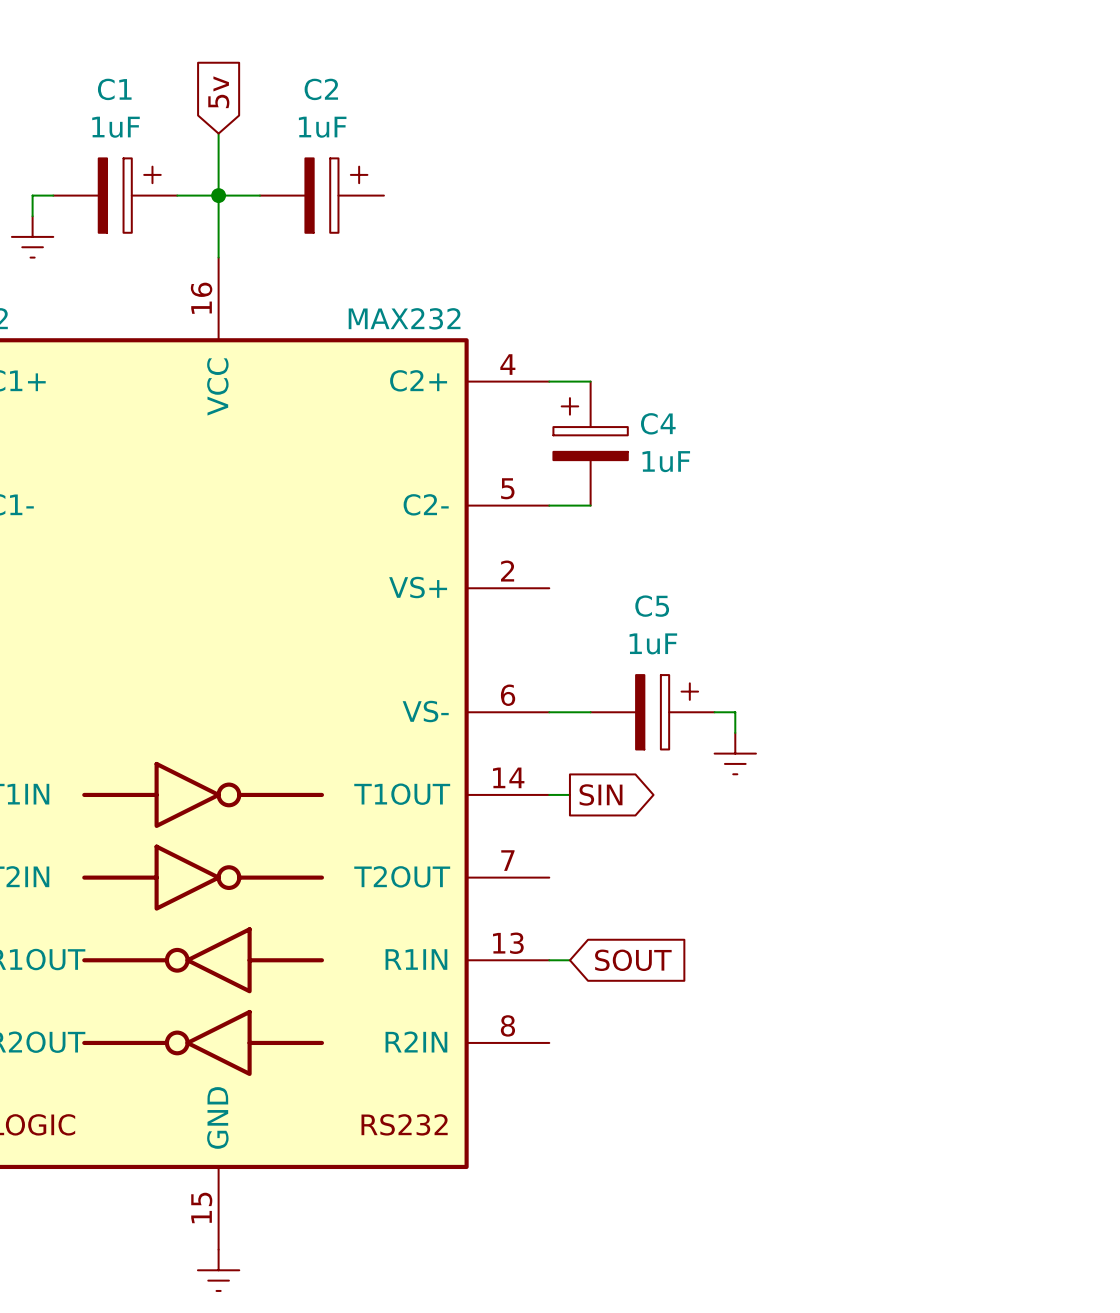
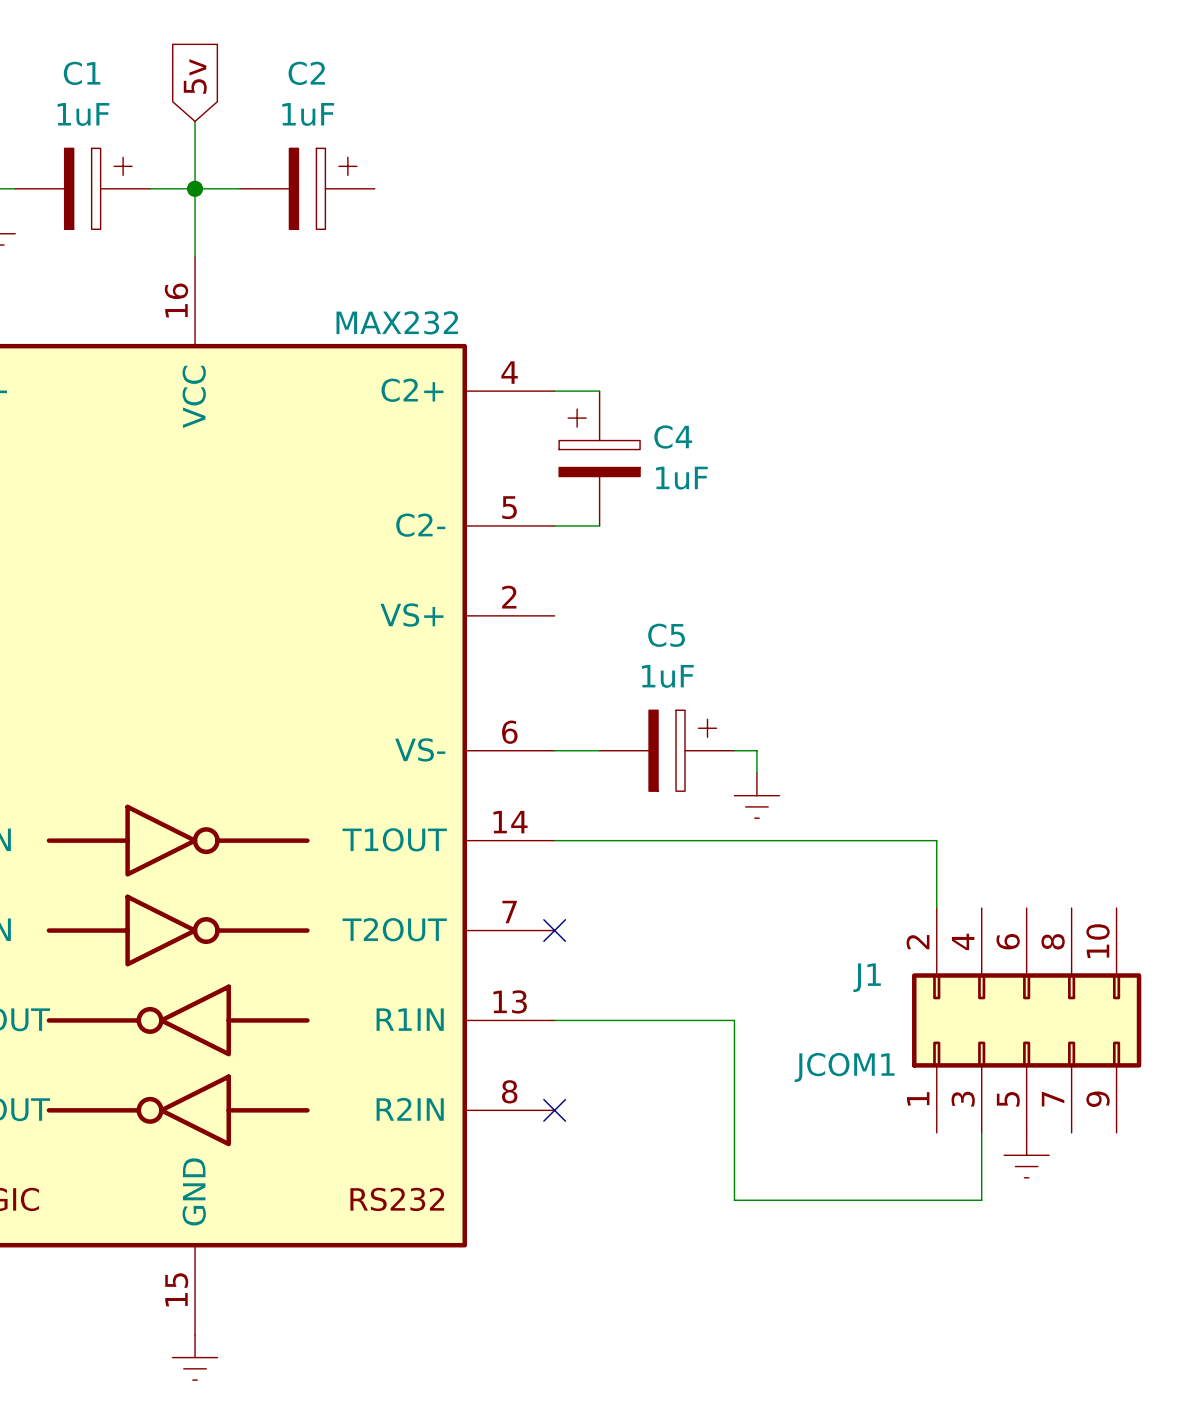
wire: none -> (577, 840) (936, 840) (936, 908)
global label: SIN (601, 794) -> none
no-connect mark: none -> (554, 930)
wire: none -> (577, 1020) (734, 1020) (734, 1200) (981, 1200) (981, 1132)
global label: SOUT (633, 960) -> none
J1: none -> JCOM1 (1026, 1020)
no-connect mark: none -> (554, 1110)
power symbol: none -> (1026, 1155)

